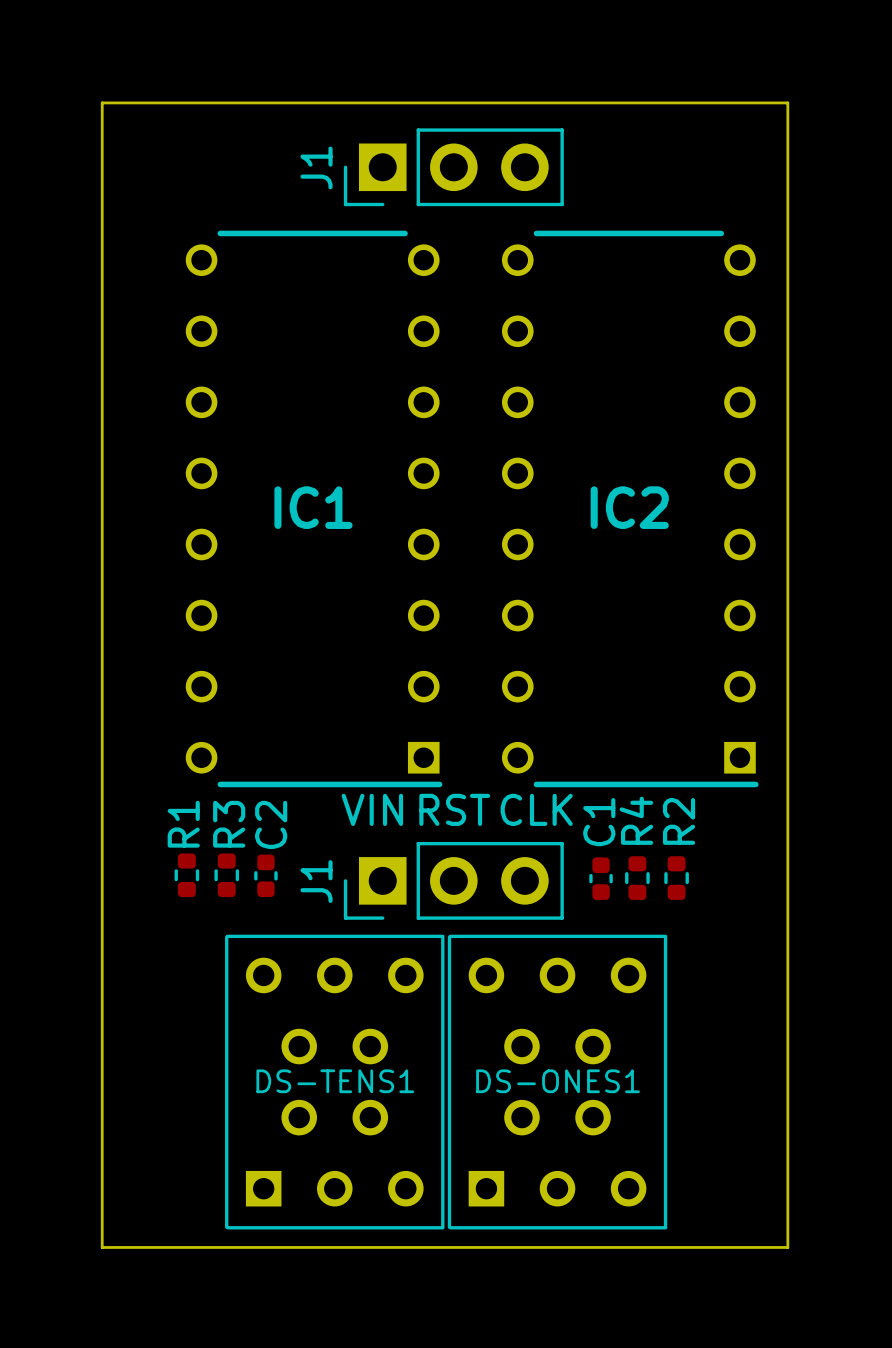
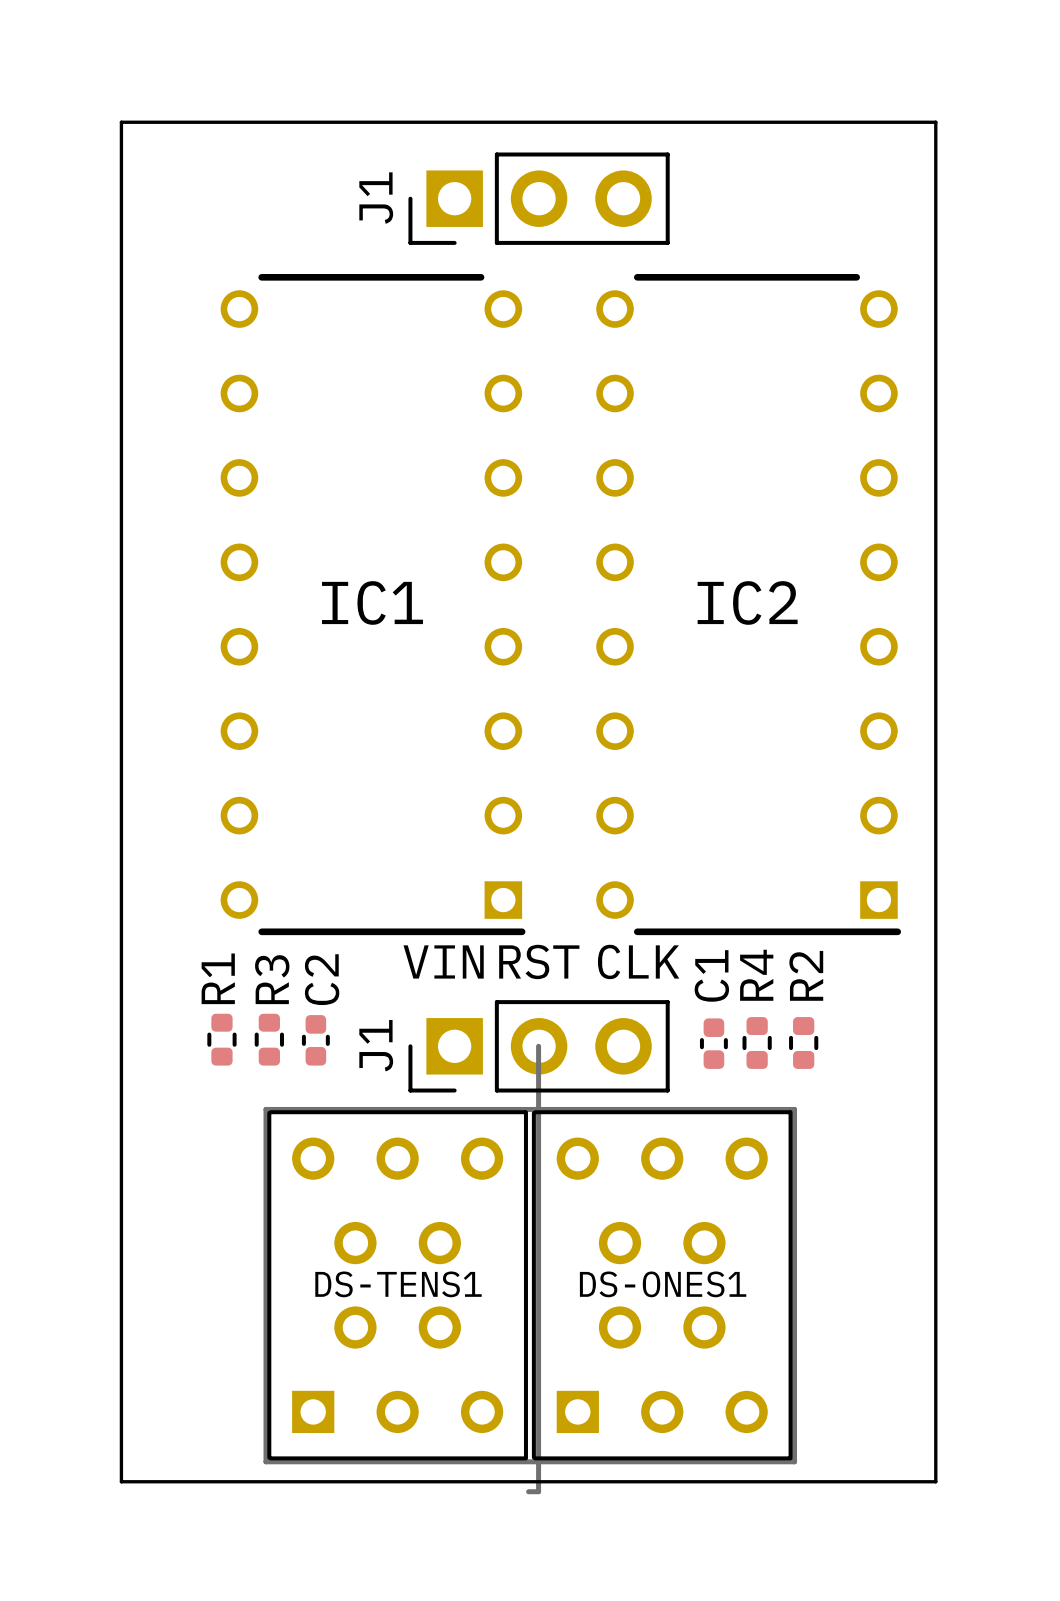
line: none -> (538, 1046) (538, 1491) (528, 1491)
line: none -> (266, 1109) (794, 1109) (794, 1461) (266, 1461) (266, 1109)

